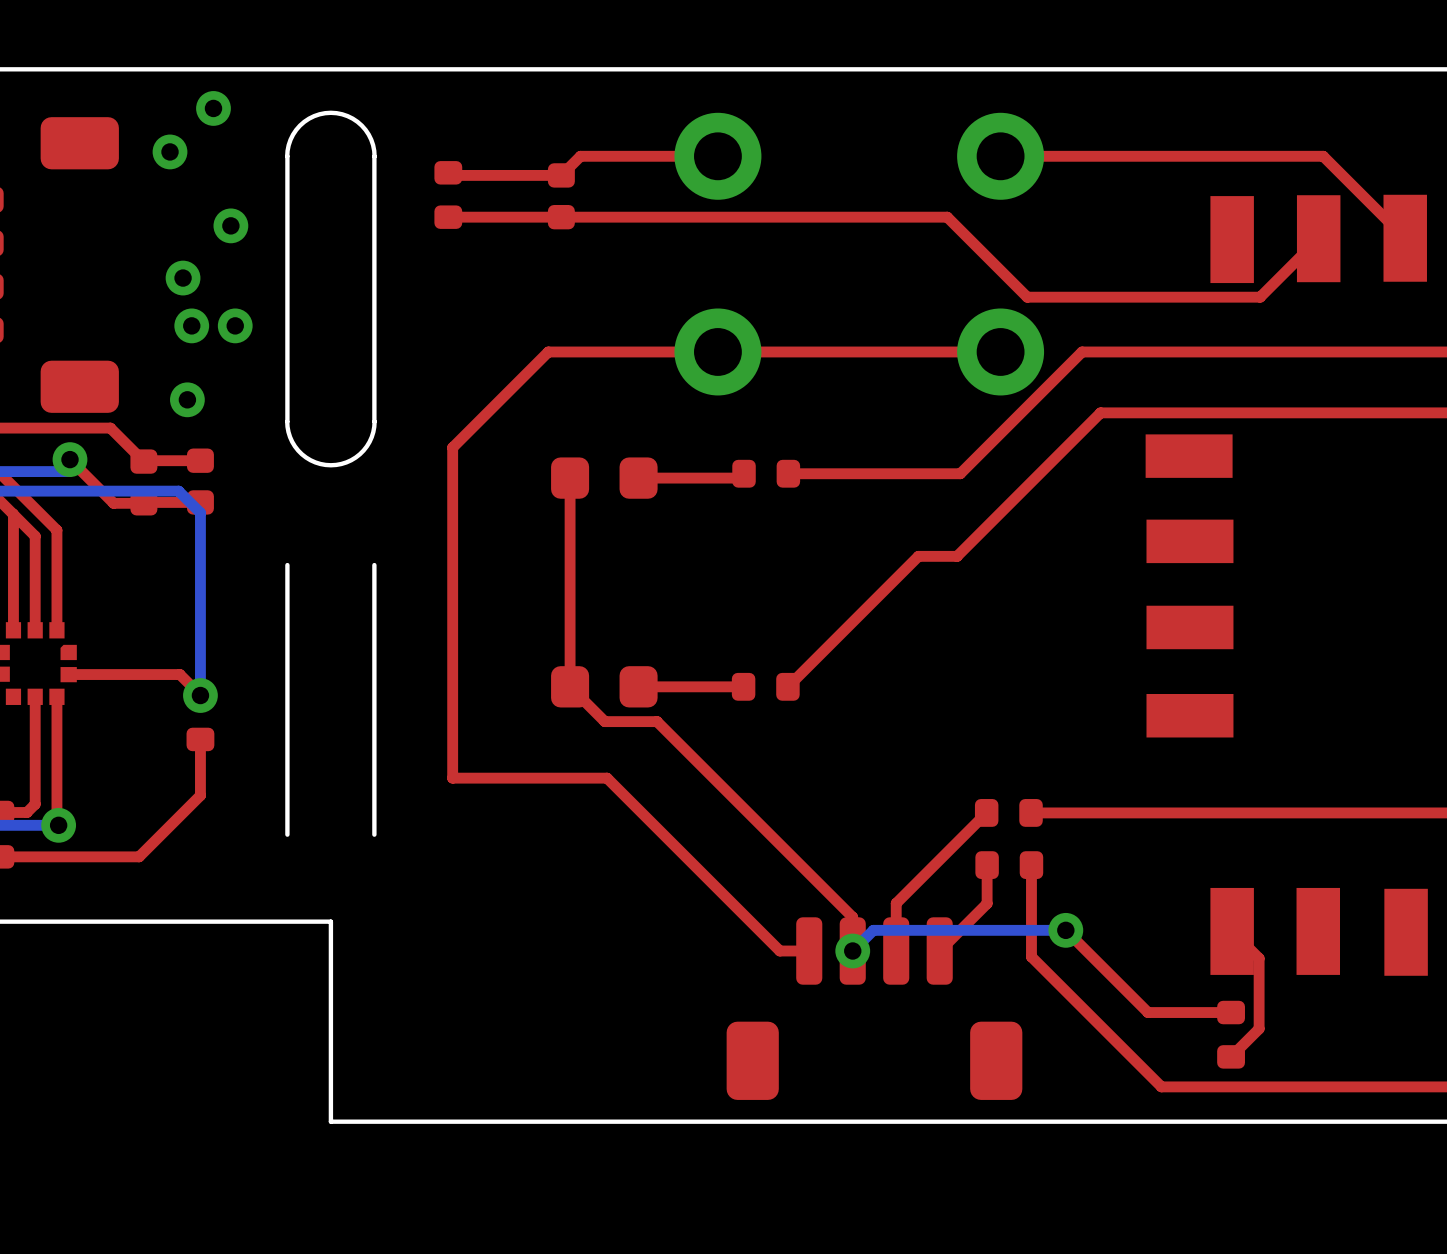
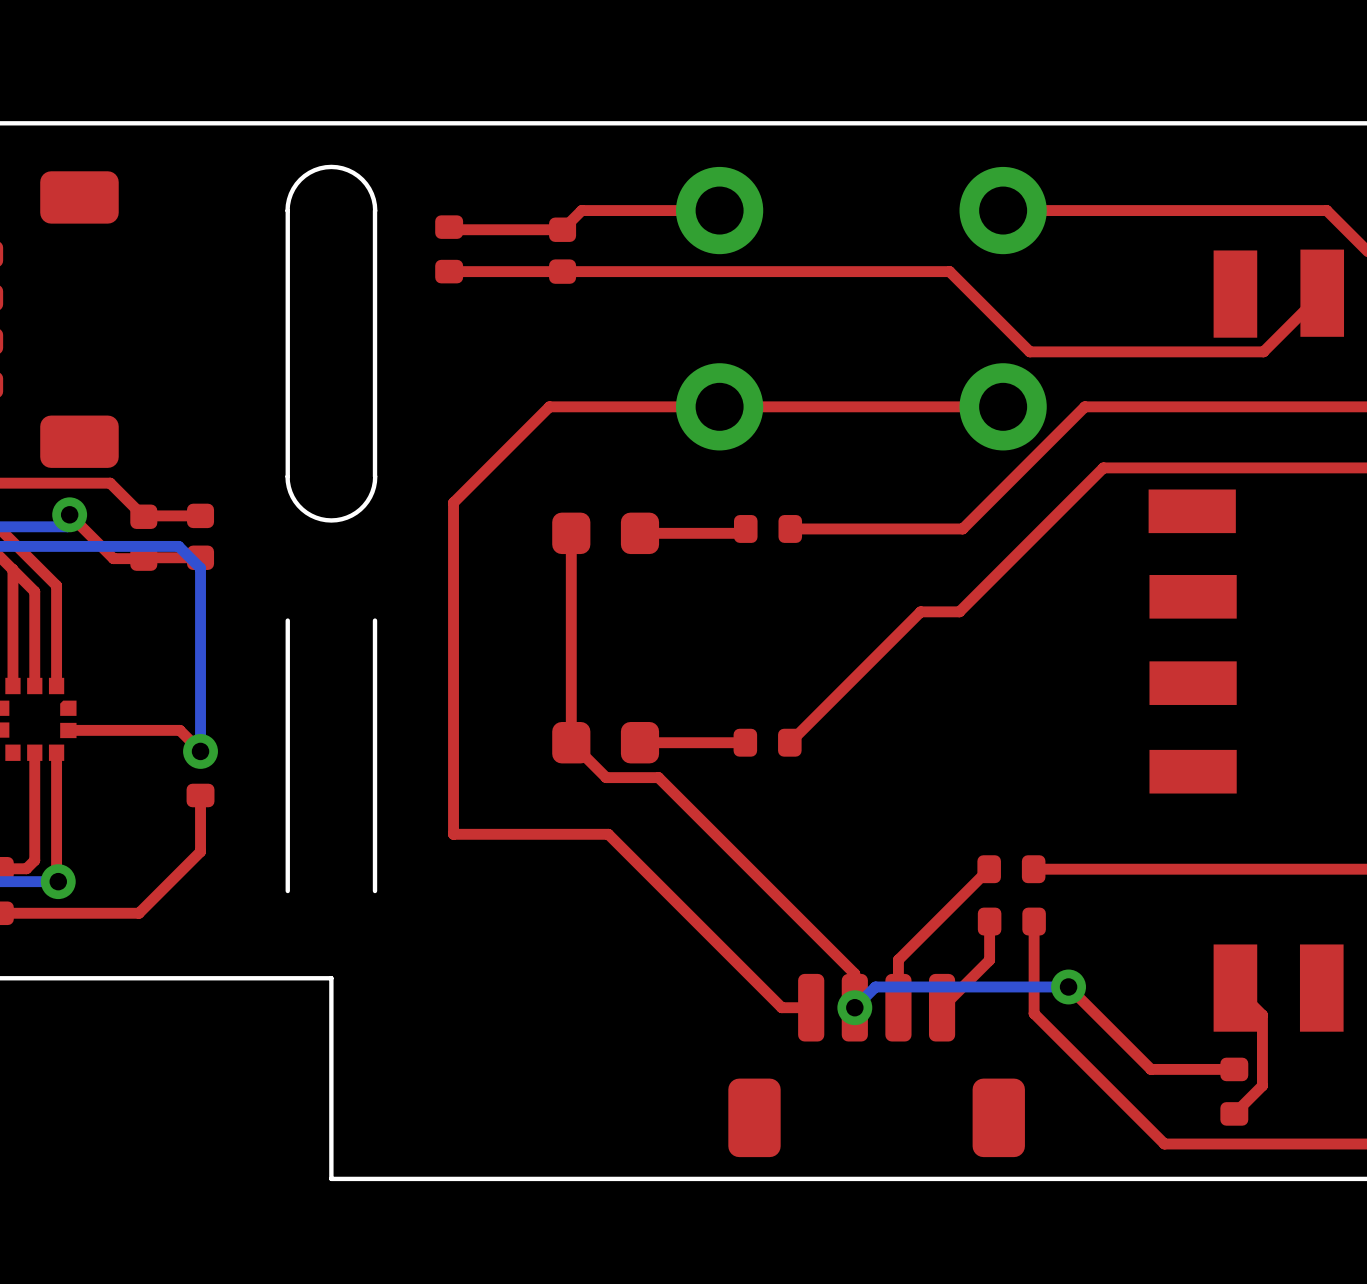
via: (213, 108) -> none
via: (170, 151) -> none
via: (230, 225) -> none
via: (183, 278) -> none
via: (191, 325) -> none
via: (235, 325) -> none
via: (187, 399) -> none

